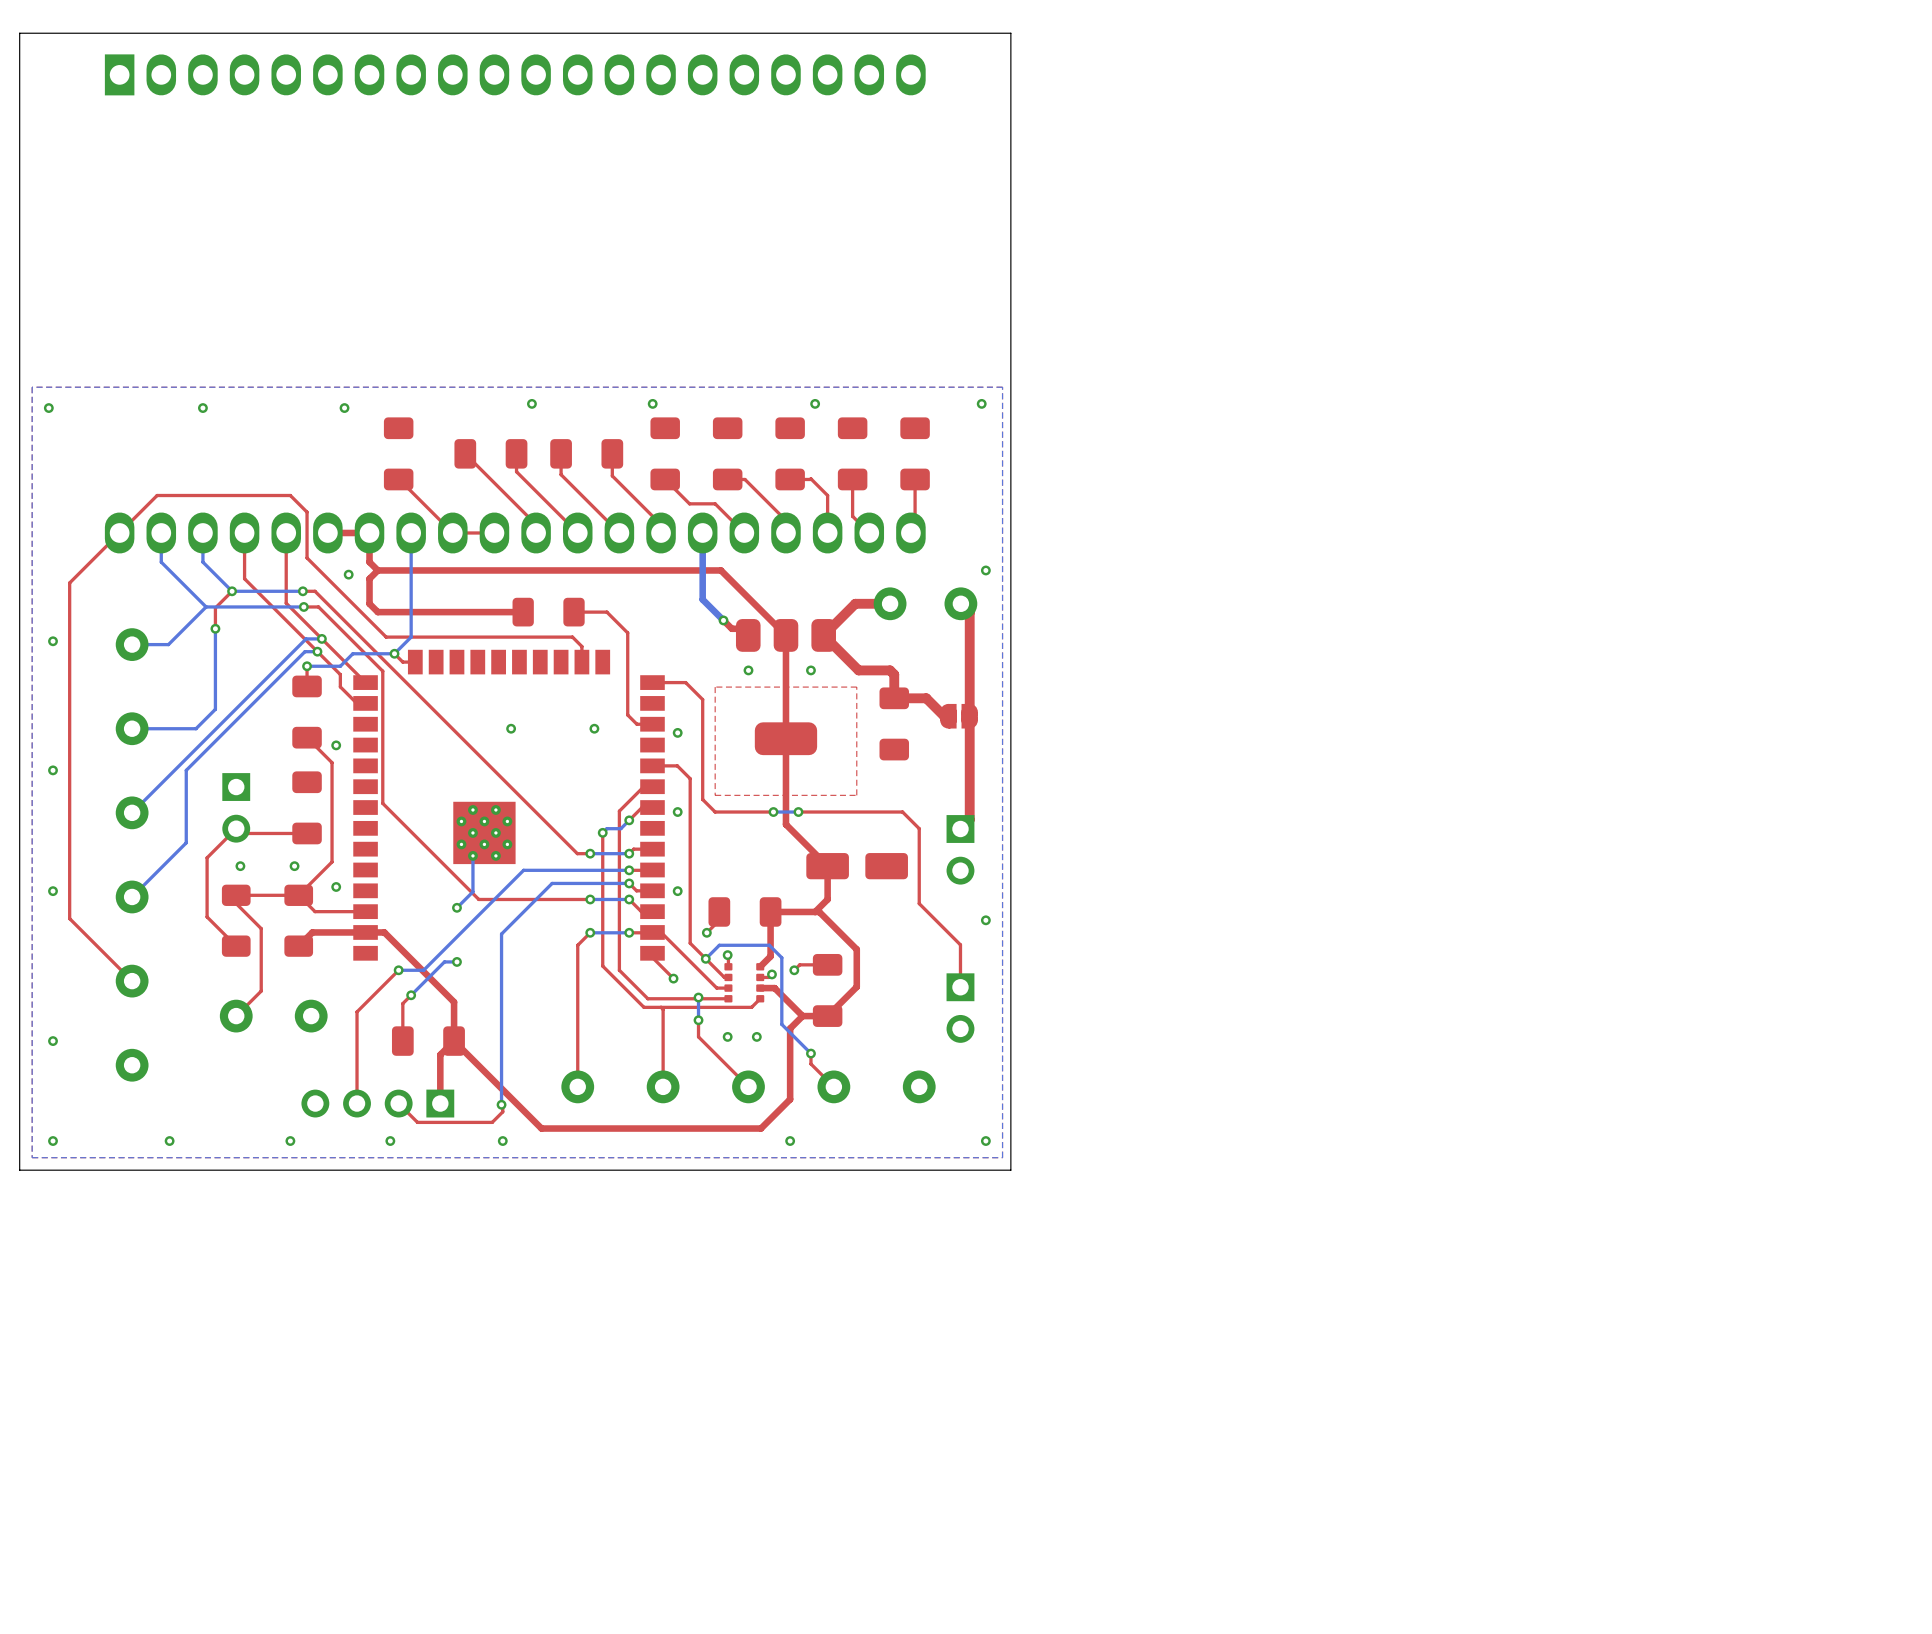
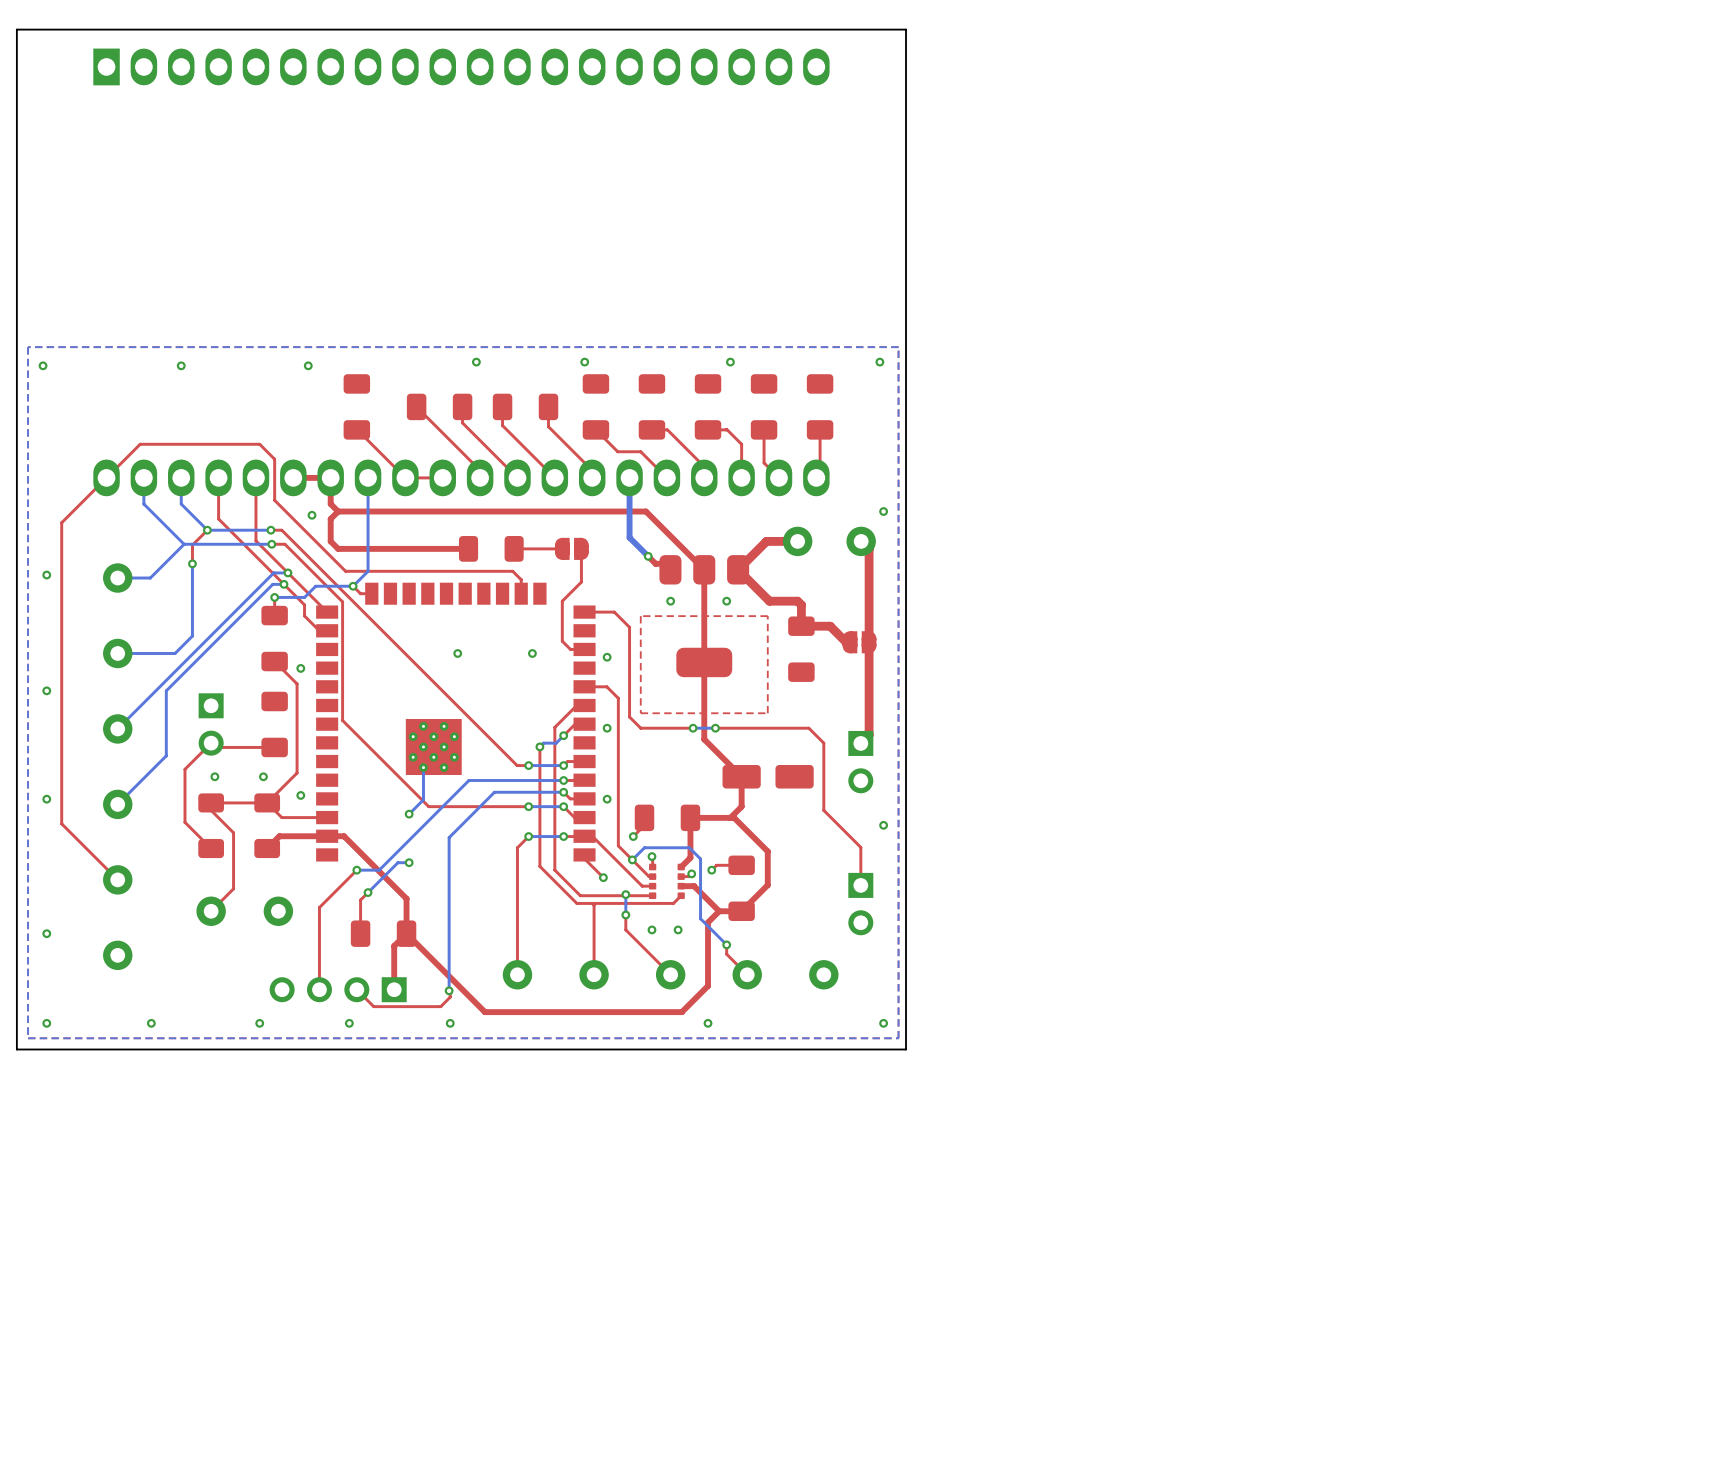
top track: (606, 612) (627, 632) (627, 670) -> (581, 548) (581, 582) (562, 601)
top track: none -> (562, 548) (543, 548)
part: none -> (571, 548)

